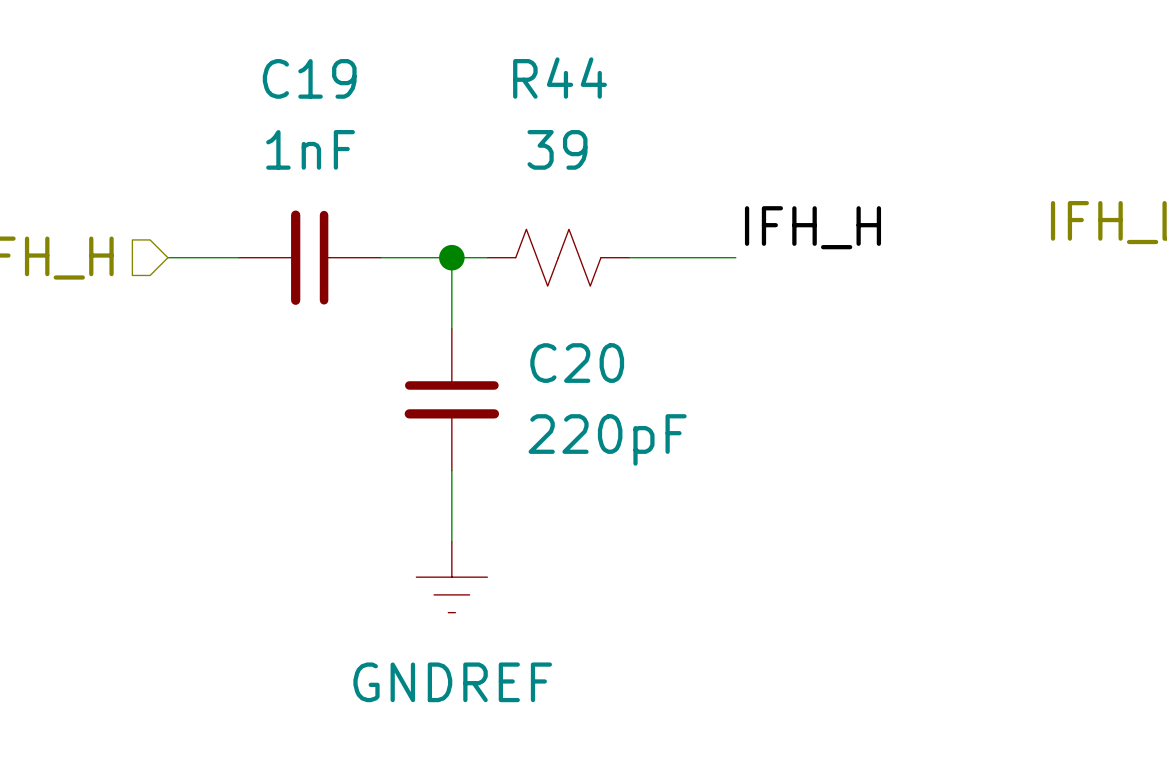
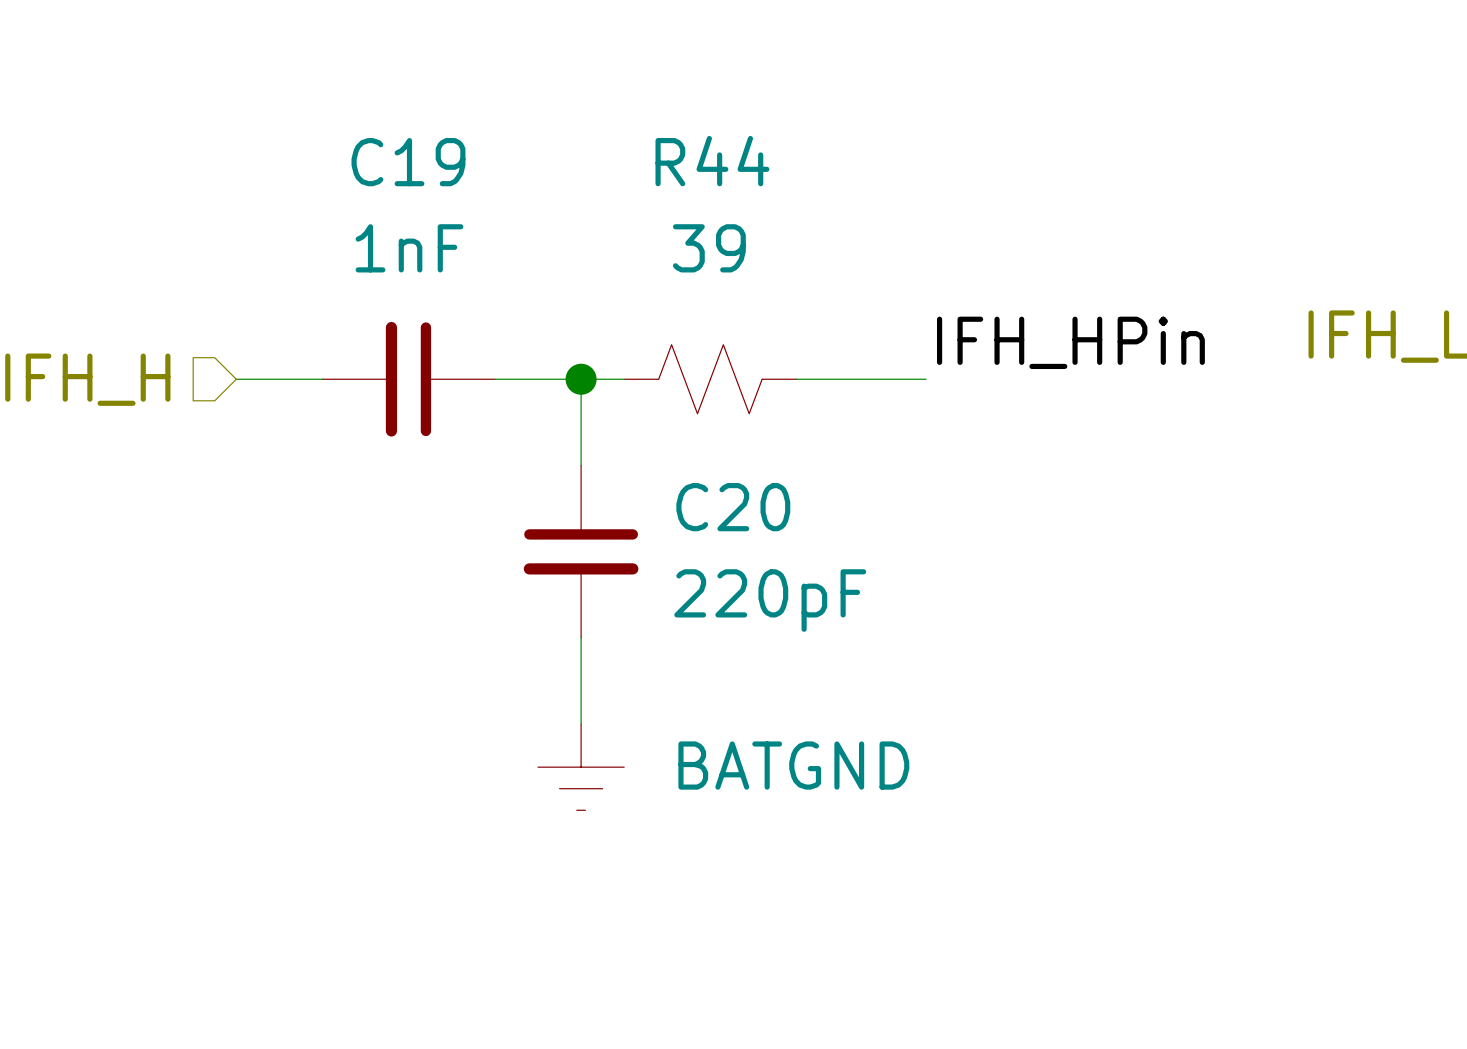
label: IFH_H (812, 227) -> IFH_HPin (1070, 342)
power symbol: GNDREF (451, 577) -> BATGND (581, 767)

